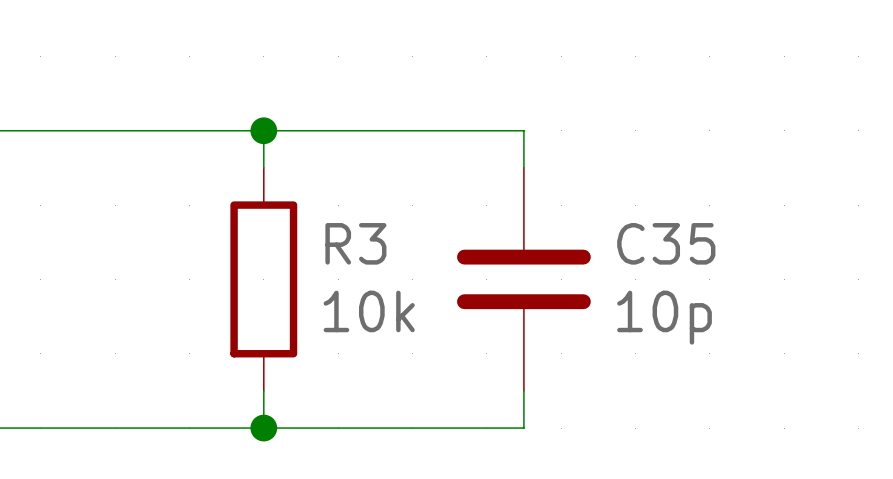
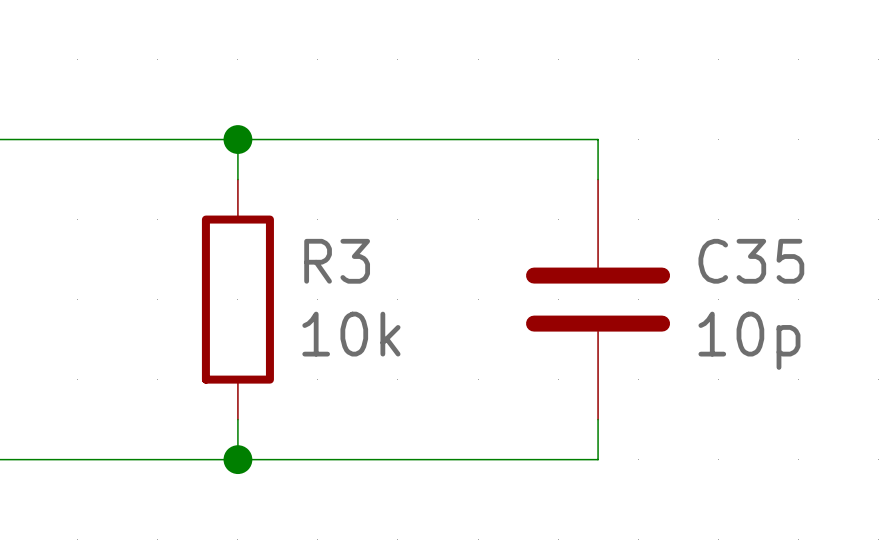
wire: (523, 130) (523, 167) -> (518, 139) (598, 139) (598, 179)
C35 position: (523, 279) -> (598, 299)
wire: (523, 390) (523, 428) -> (598, 419) (598, 459) (518, 459)

